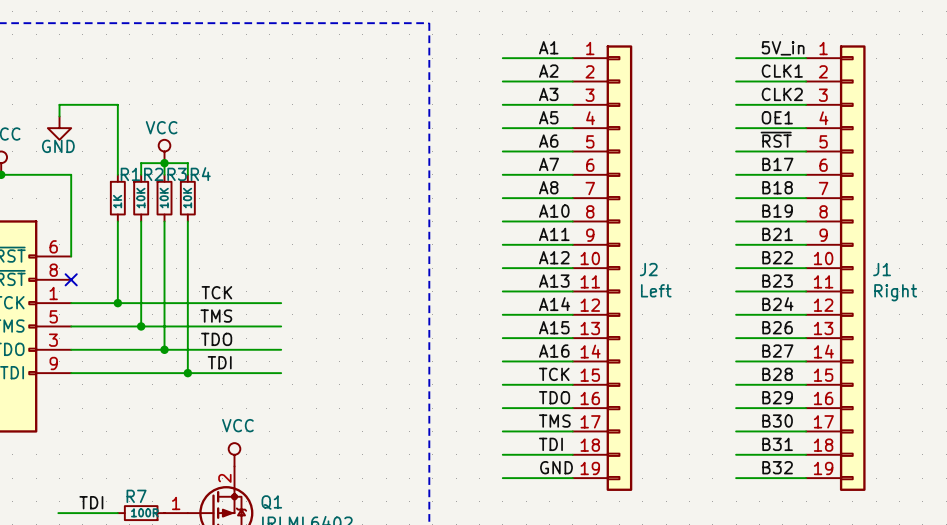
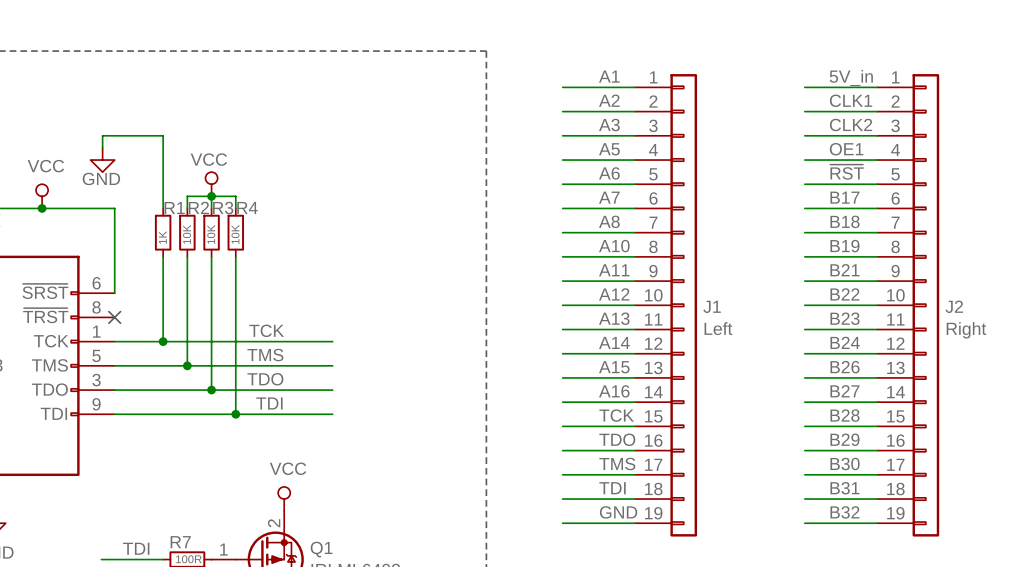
J2 name: J2 (648, 269) -> J1 (712, 306)
J1 name: J1 (882, 269) -> J2 (954, 306)

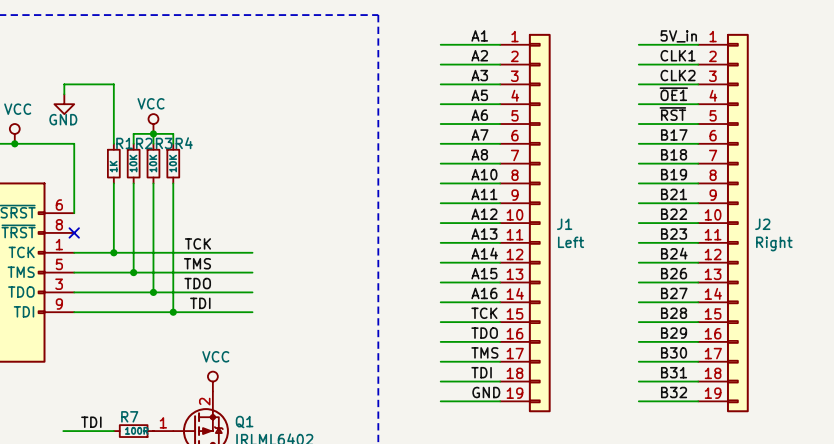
label: OE1 (846, 149) -> ~{OE1} (673, 94)

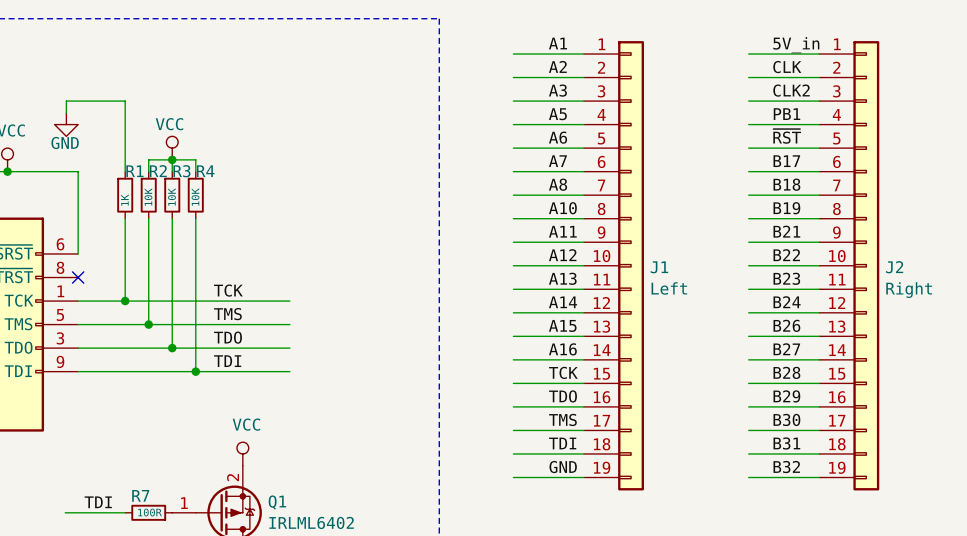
label: CLK1 (678, 55) -> CLK (787, 67)
label: ~{OE1} (673, 94) -> PB1 (787, 114)

